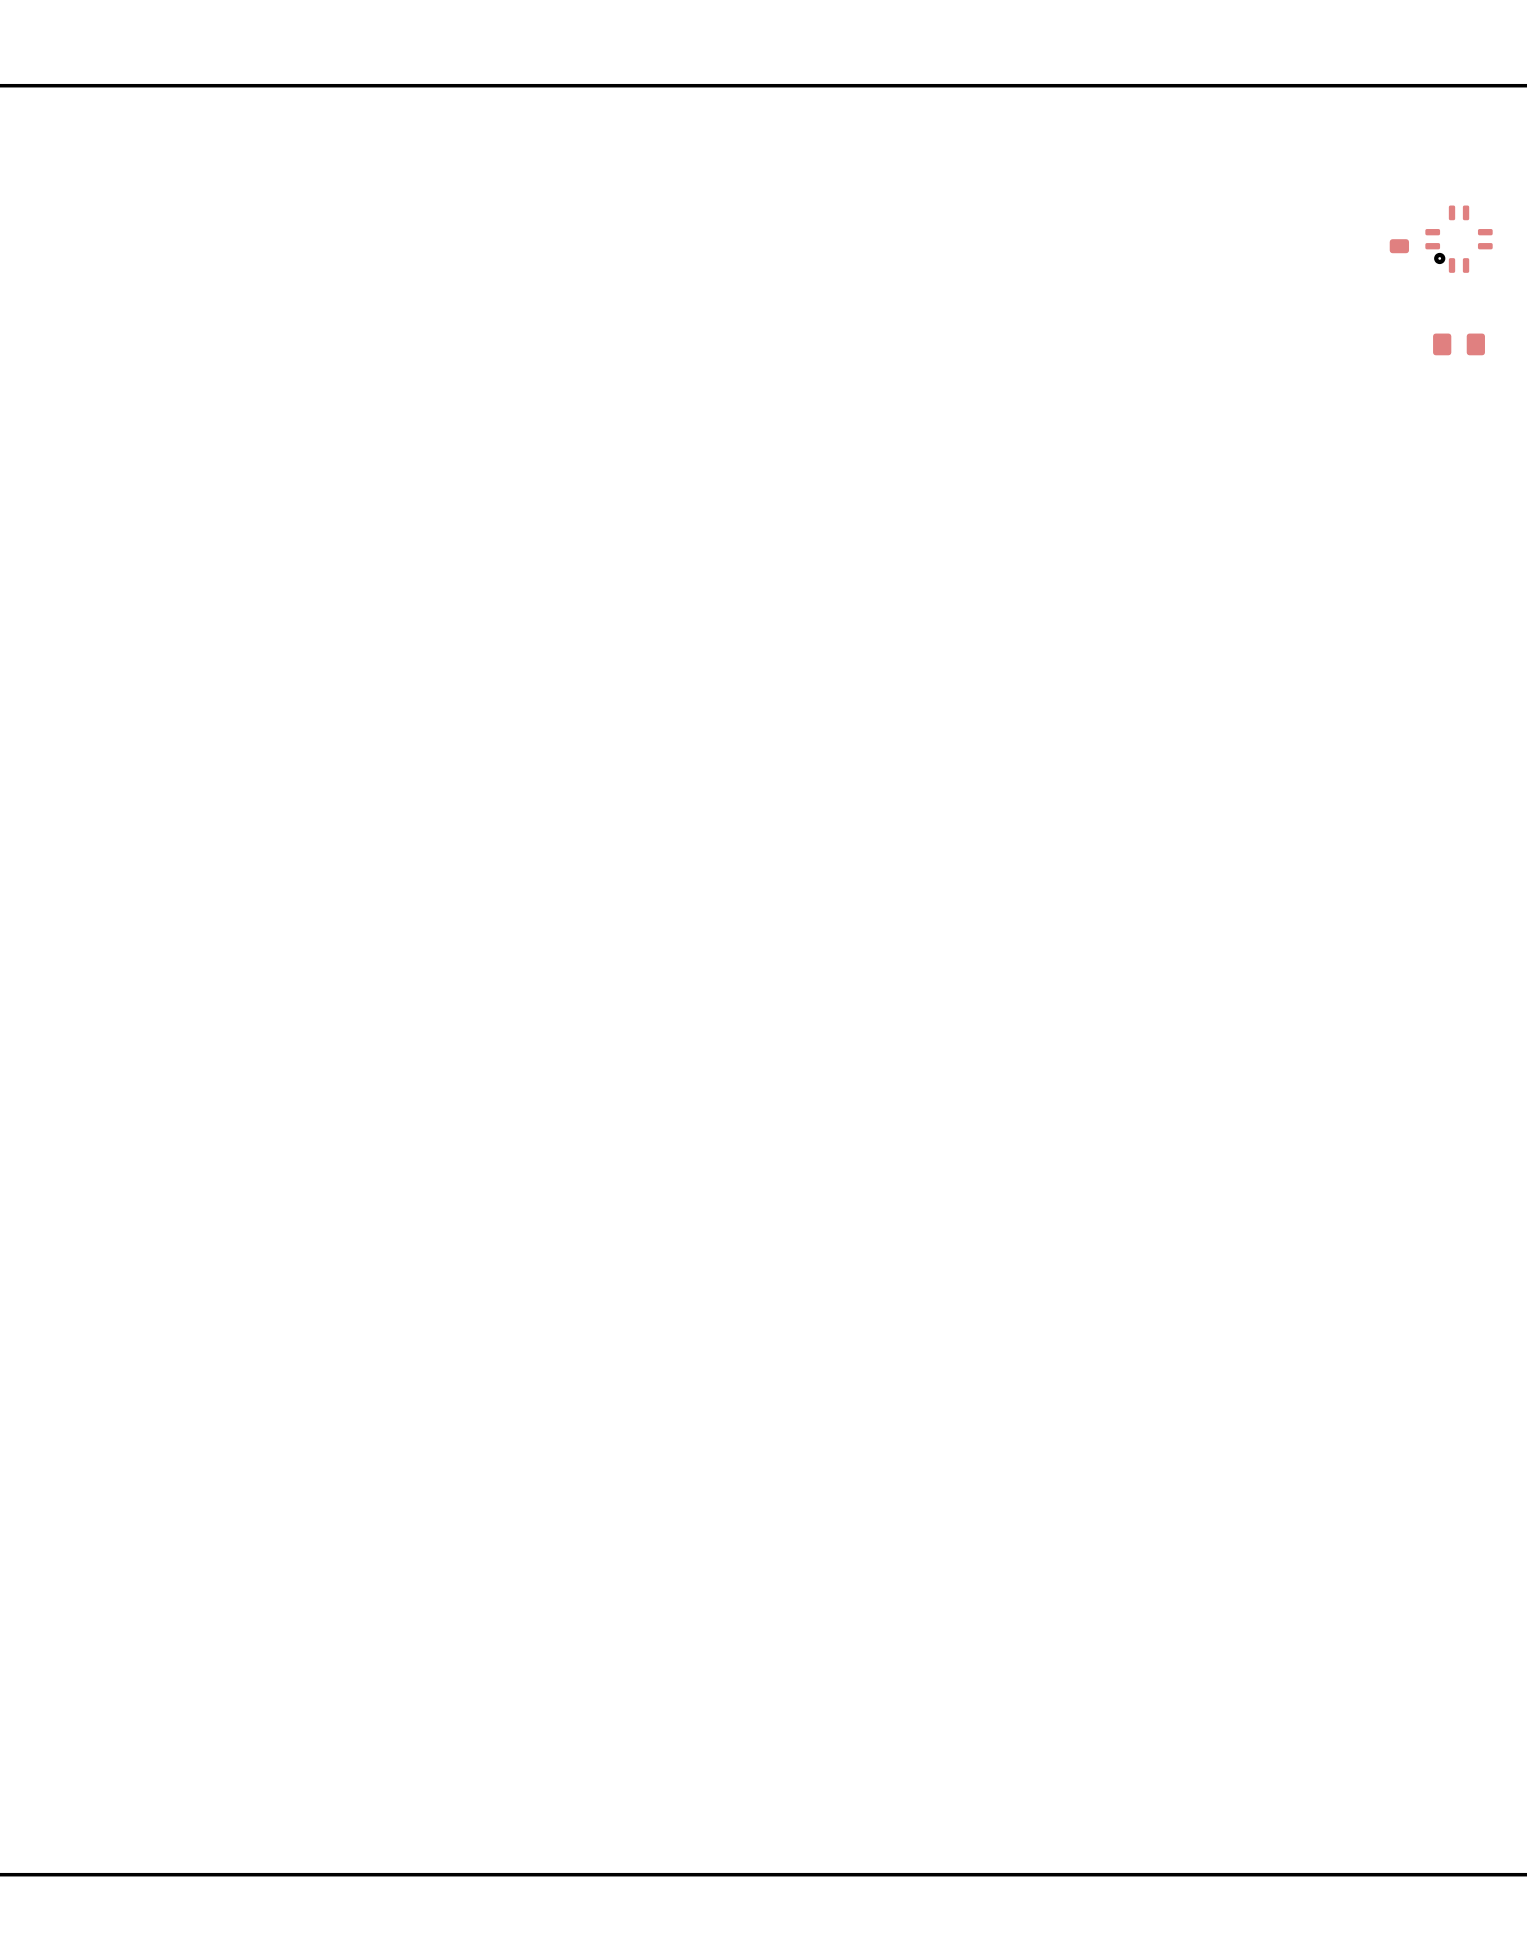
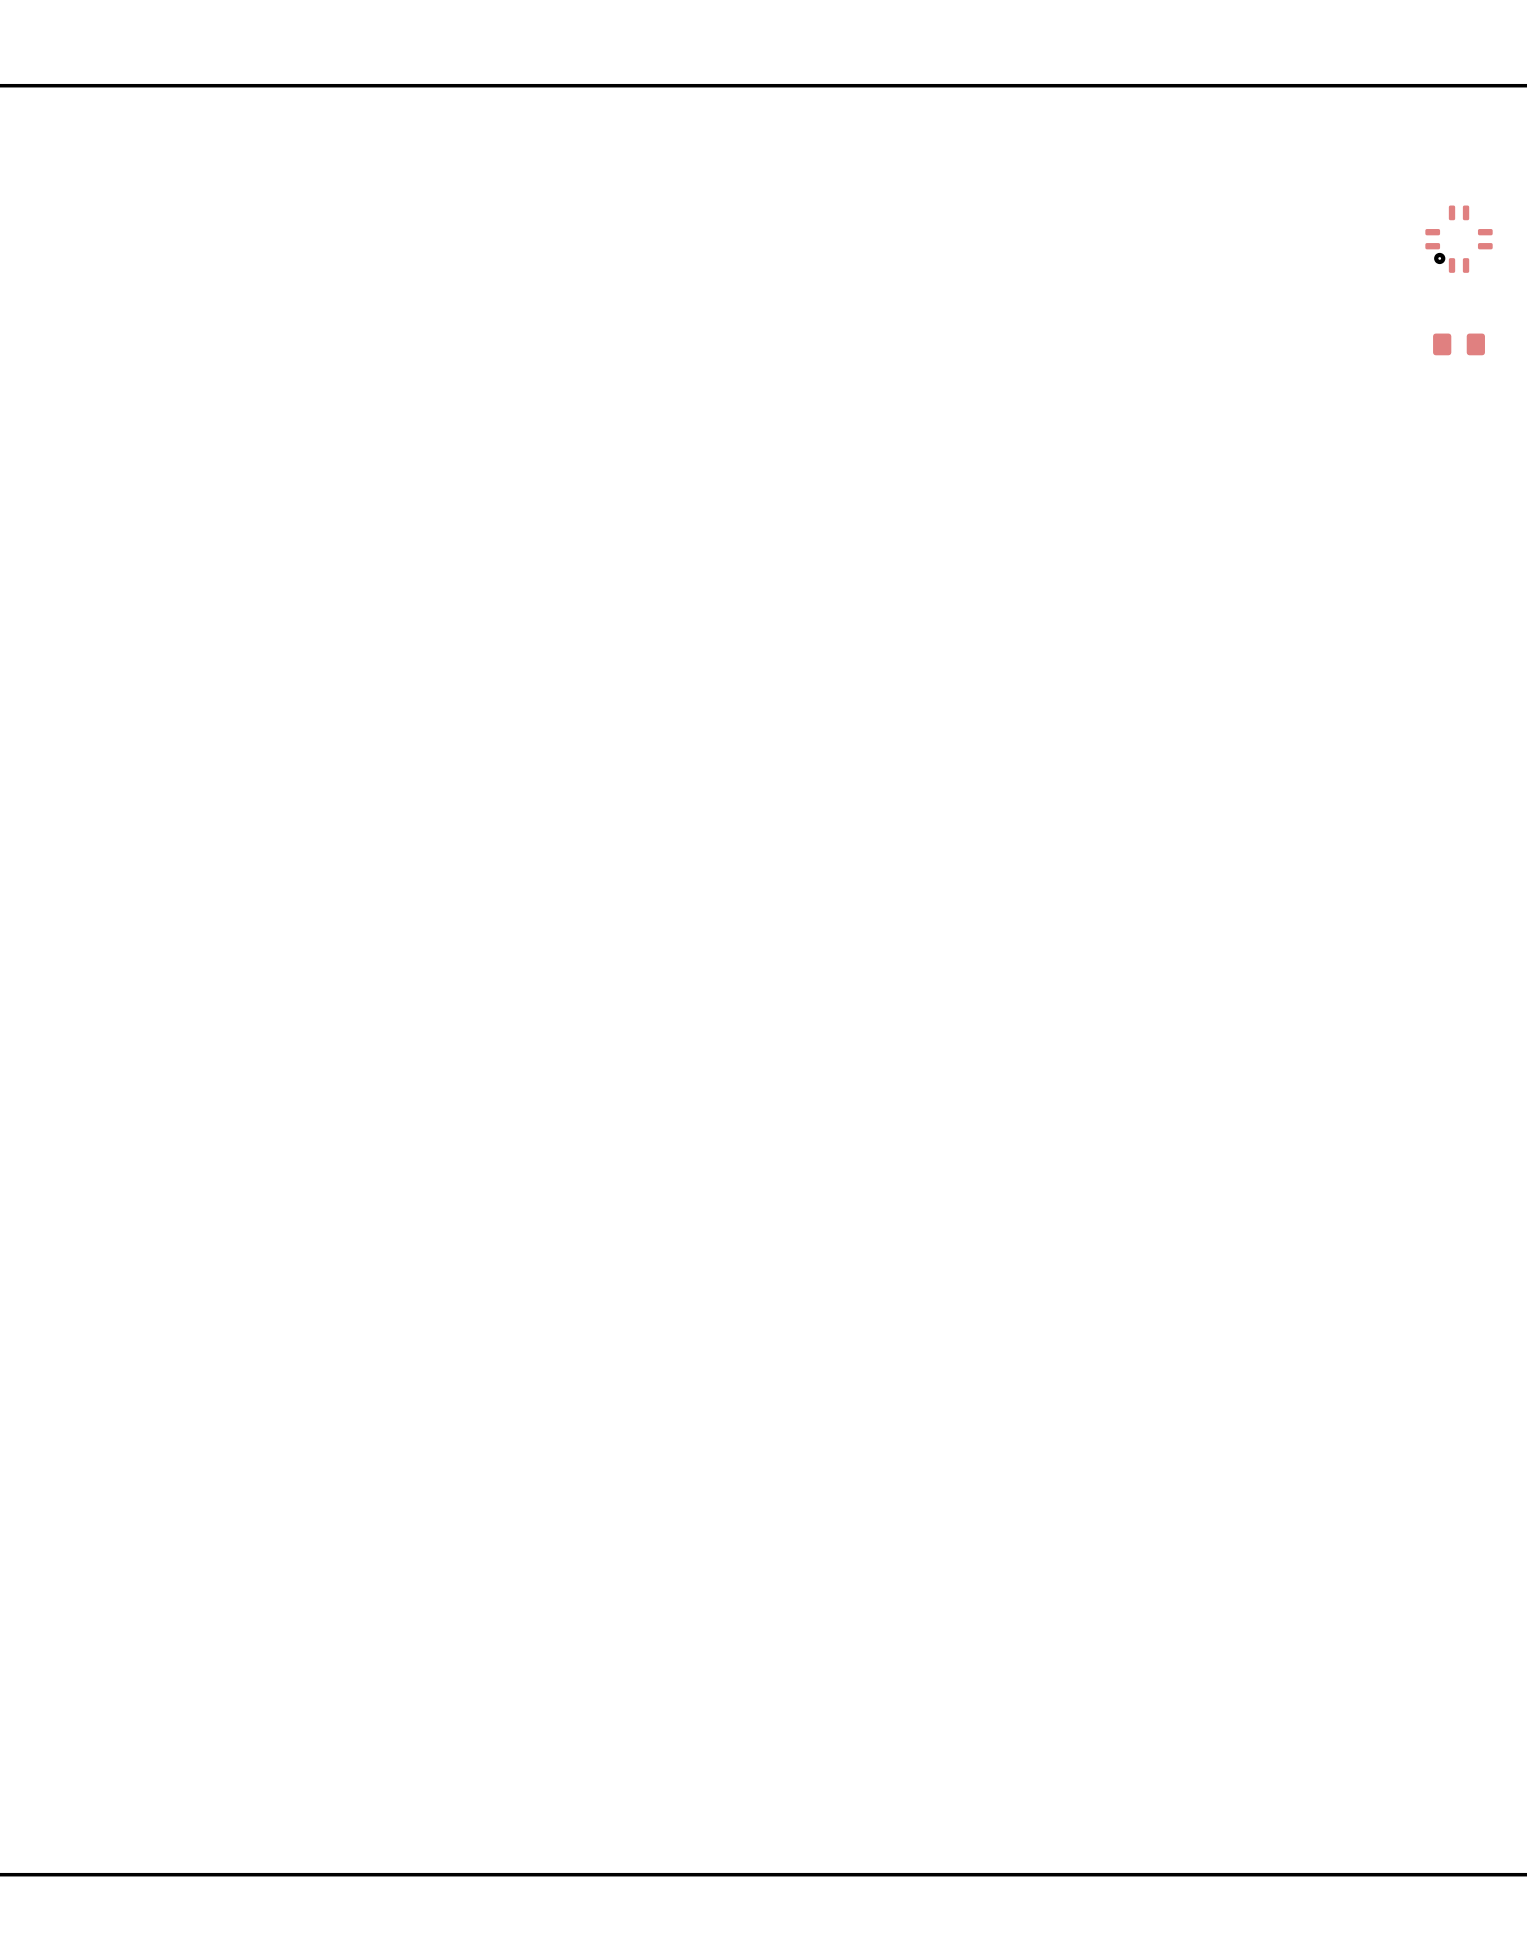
part: (1399, 246) -> none

